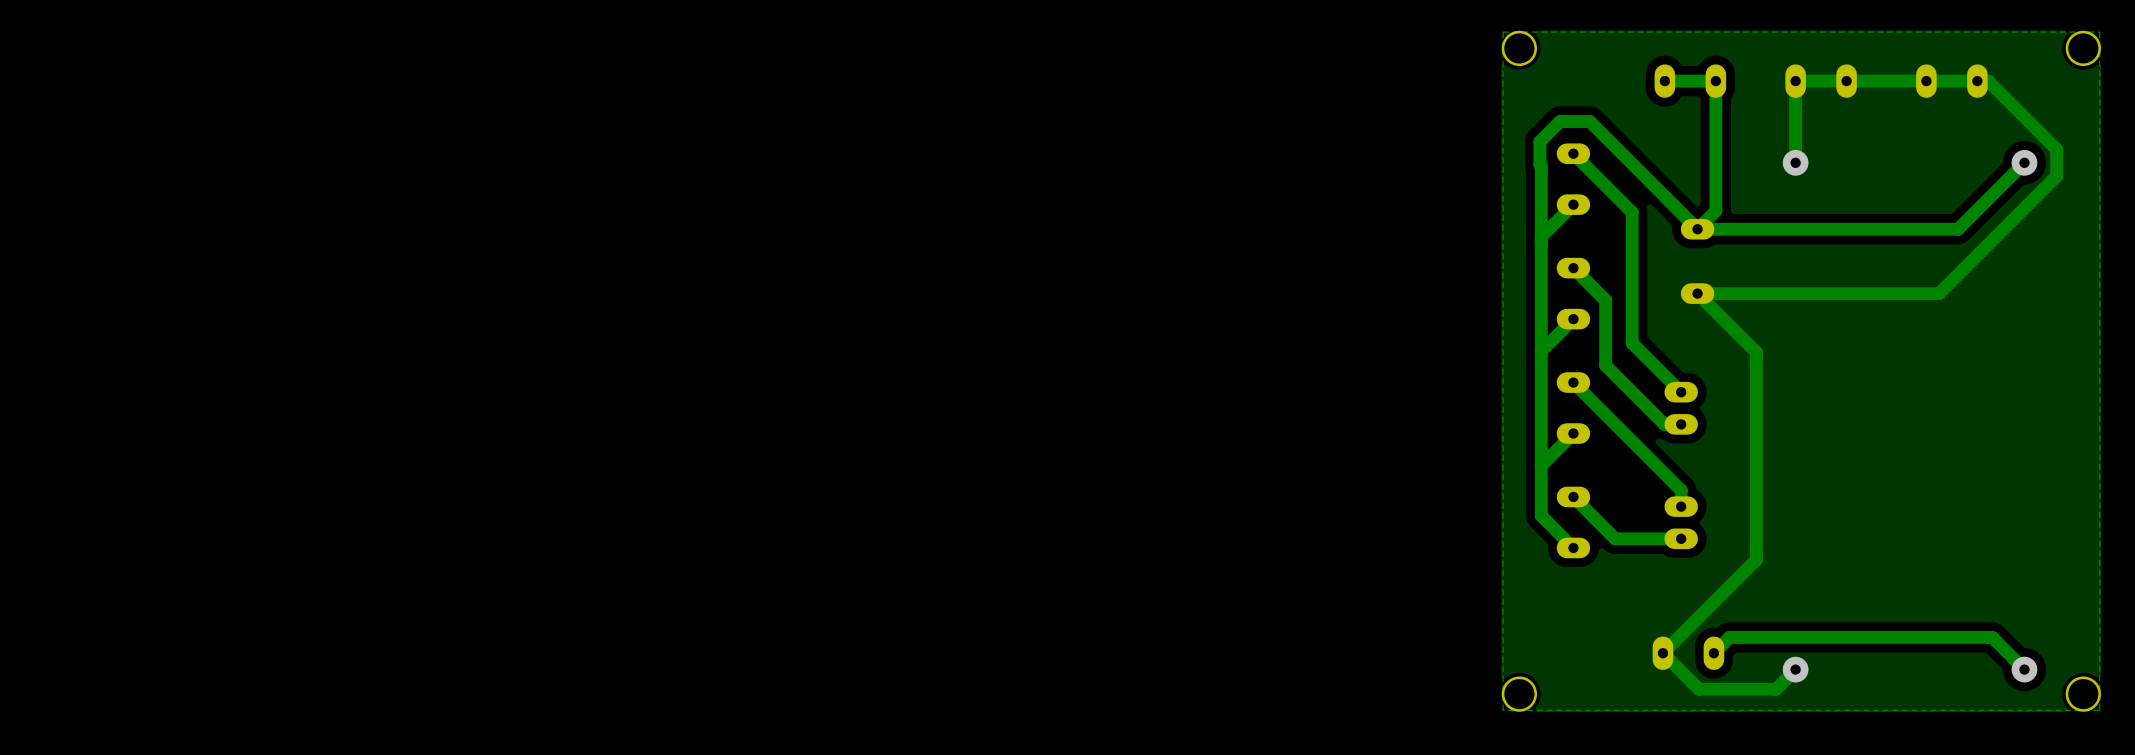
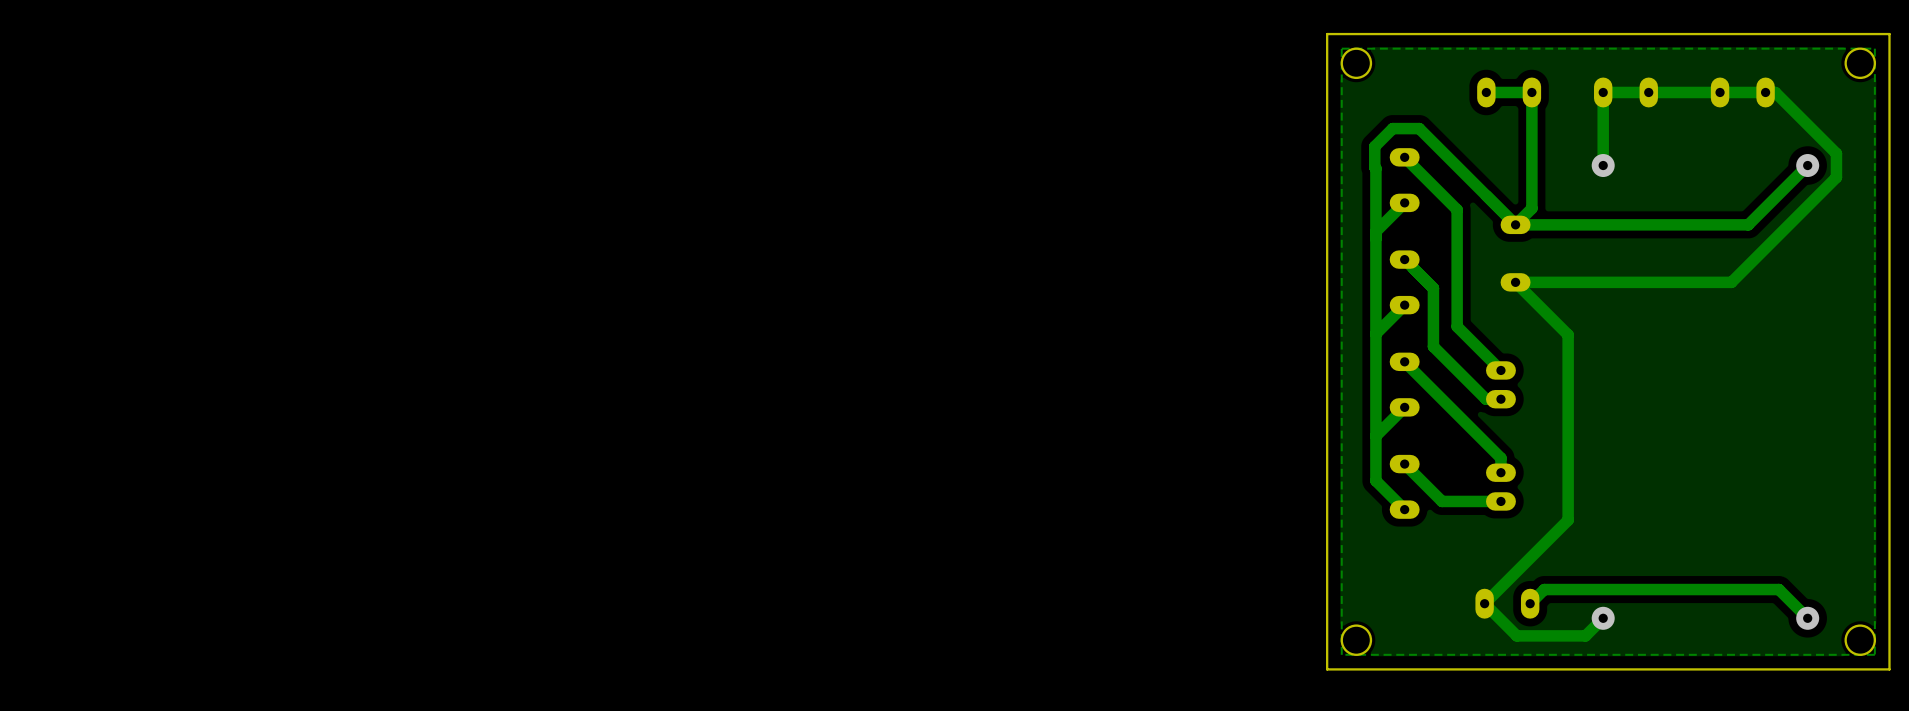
board edge: none -> (1889, 34) (1327, 34) (1327, 669) (1889, 669) (1889, 34)

